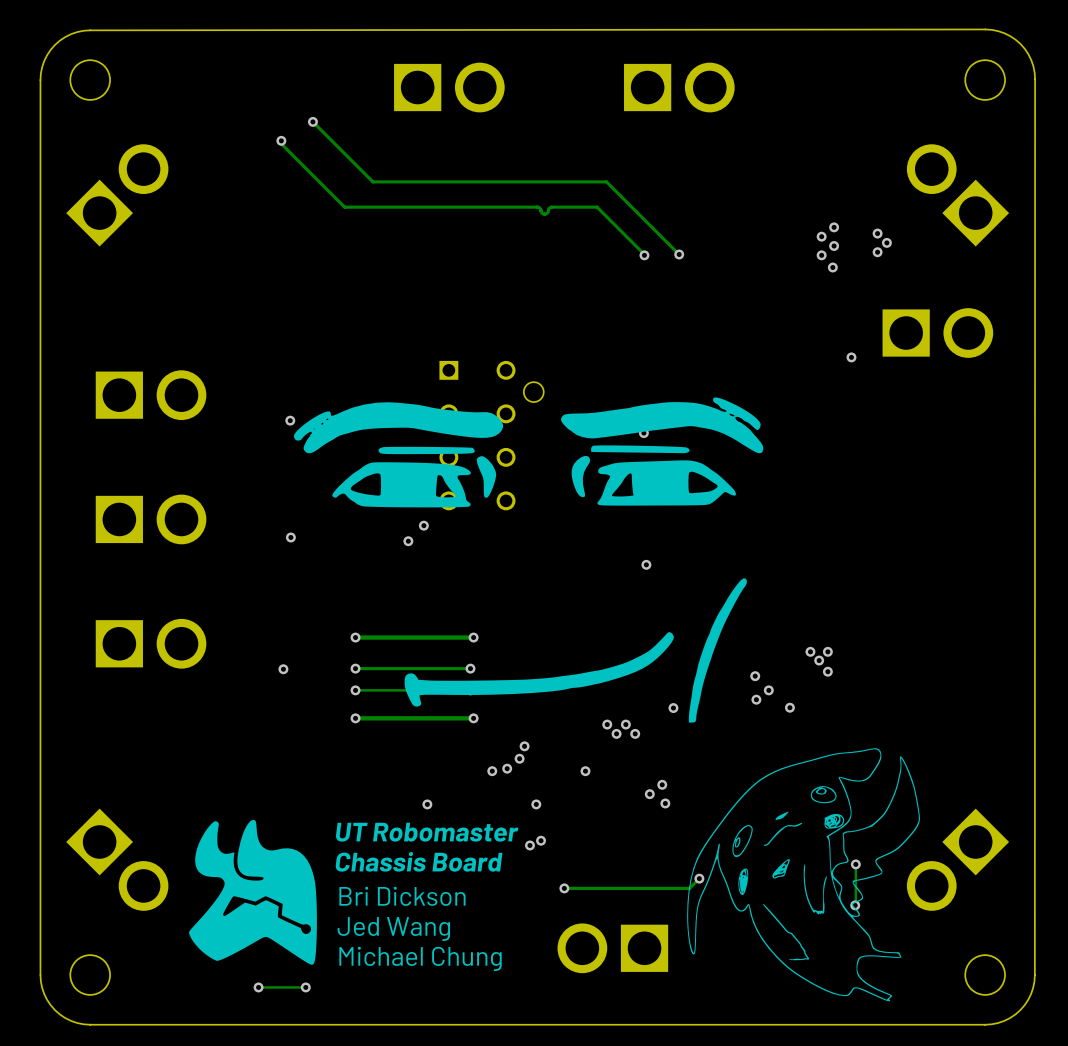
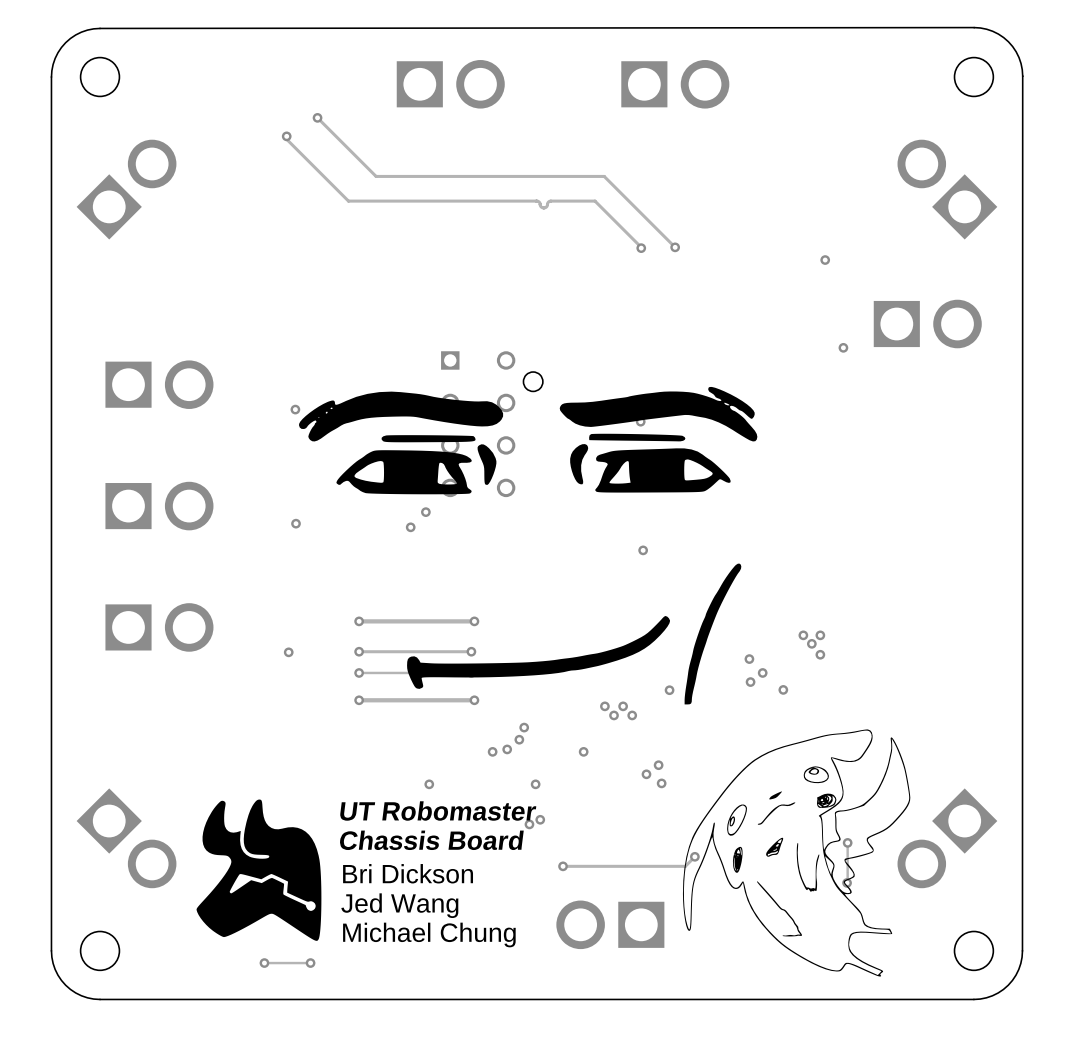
via: (834, 227) -> none
via: (877, 233) -> none
via: (821, 236) -> none
via: (886, 242) -> none
via: (834, 246) -> none
via: (877, 252) -> none
via: (821, 255) -> none

